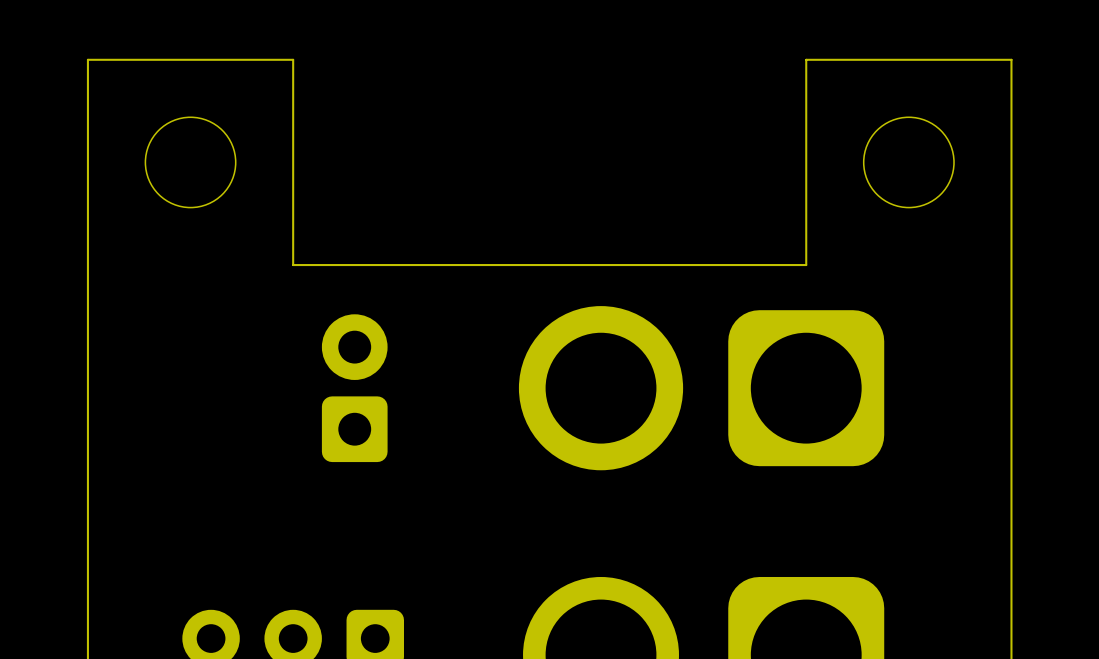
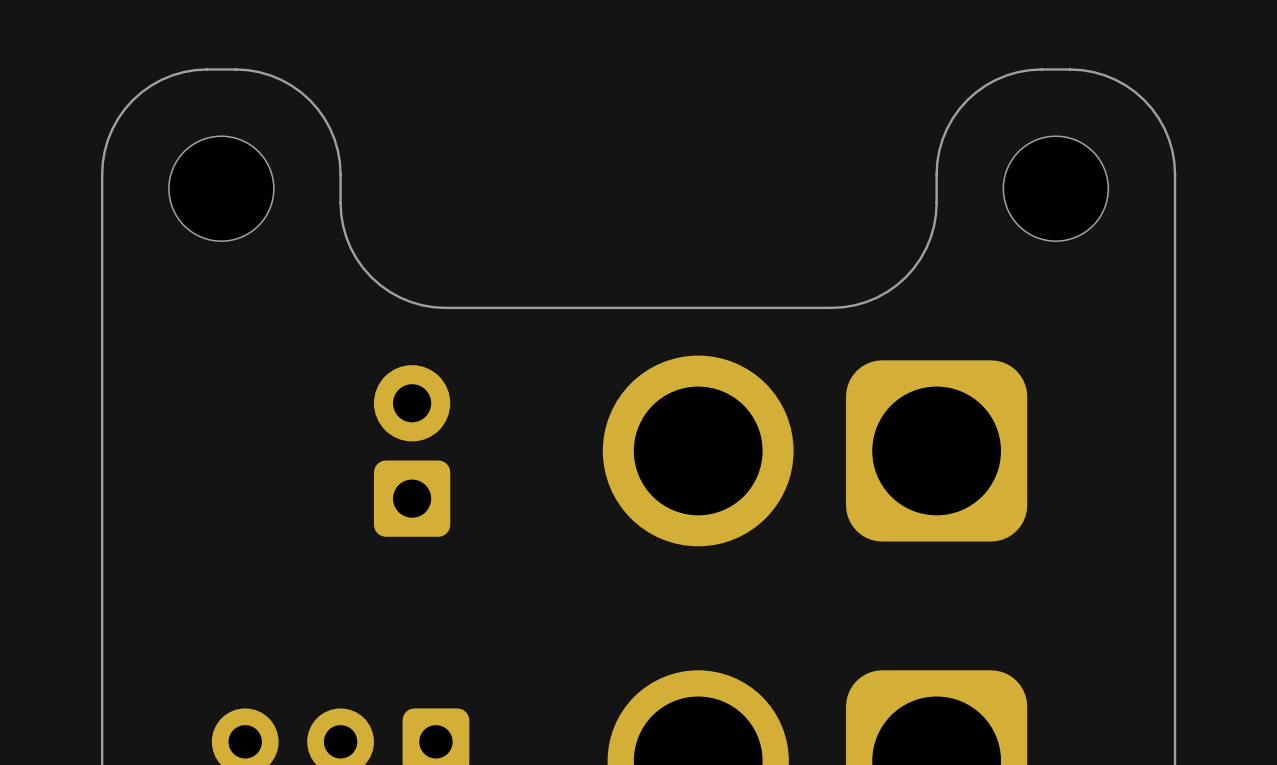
board edge: (178, 59) (87, 59) (87, 150) -> (207, 69) (172, 75) (151, 85) (132, 100) (118, 118) (108, 139) (102, 174)
board edge: (202, 59) (293, 59) (293, 150) -> (235, 69) (259, 72) (281, 79) (309, 100) (330, 128) (337, 151) (340, 174)
board edge: (896, 59) (806, 59) (806, 150) -> (1041, 69) (1018, 72) (996, 79) (967, 100) (952, 118) (942, 139) (936, 174)
board edge: (921, 59) (1011, 59) (1011, 150) -> (1070, 69) (1093, 72) (1115, 79) (1144, 100) (1164, 128) (1172, 151) (1175, 174)
board edge: (293, 174) (293, 265) (383, 265) -> (340, 202) (346, 237) (356, 258) (371, 277) (389, 291) (410, 302) (445, 307)
board edge: (806, 174) (806, 265) (715, 265) -> (936, 202) (933, 226) (926, 248) (905, 277) (887, 291) (866, 302) (831, 307)

